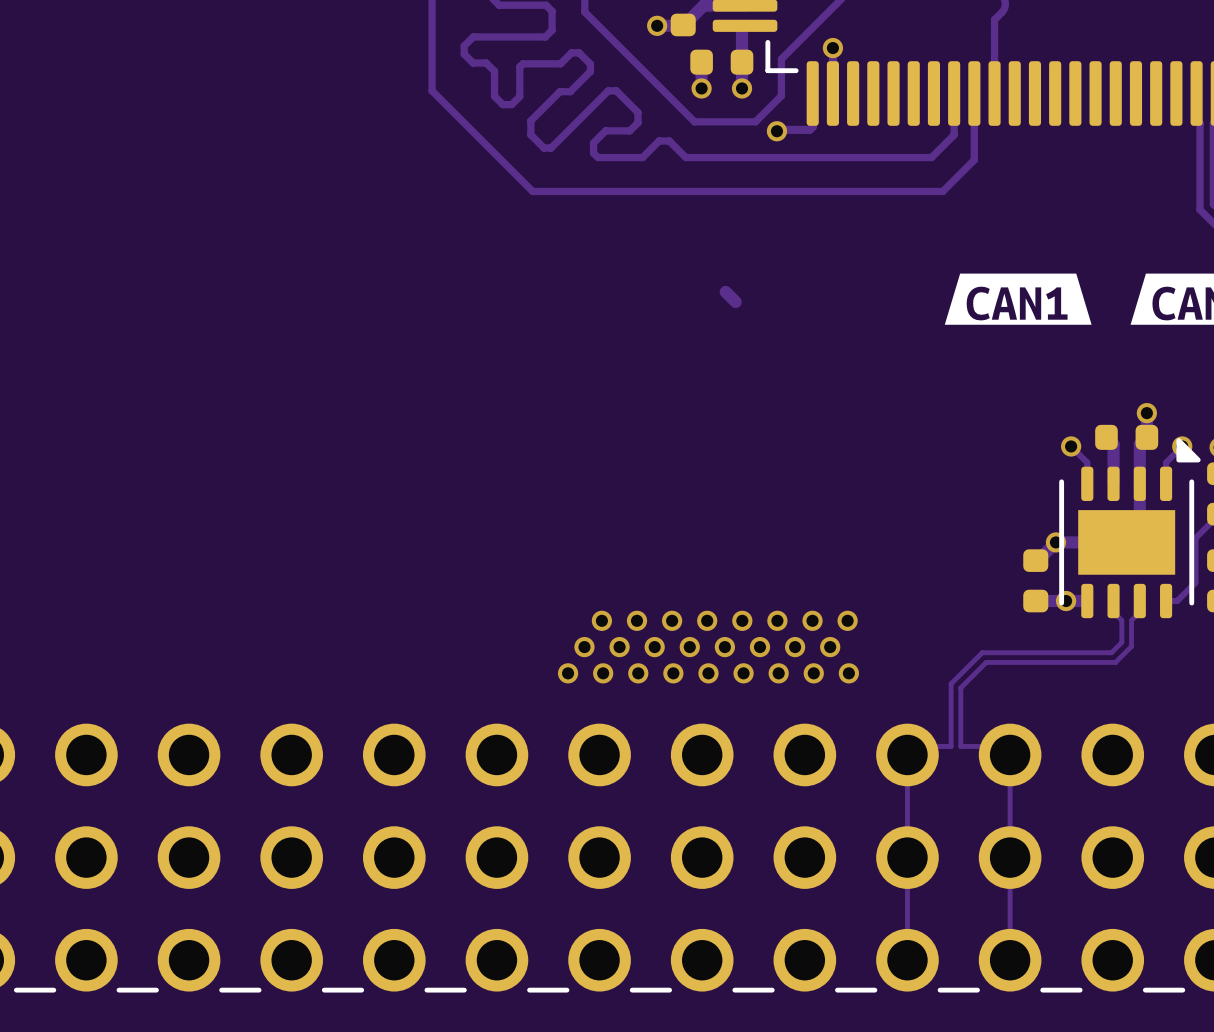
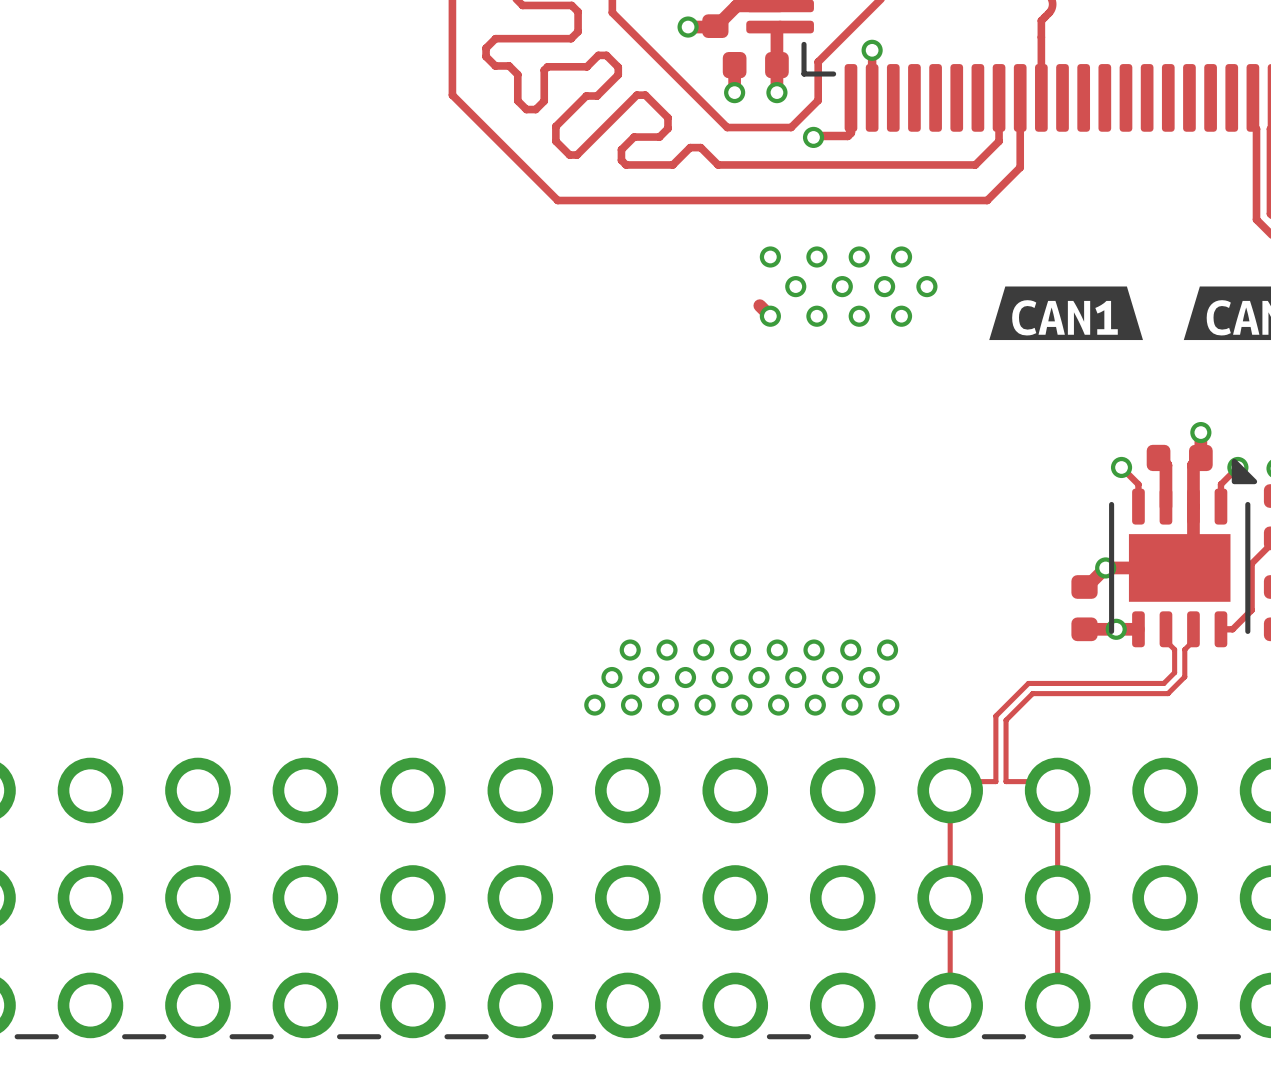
via: none -> (770, 256)
via: none -> (816, 256)
via: none -> (859, 256)
via: none -> (901, 256)
via: none -> (795, 286)
via: none -> (842, 286)
via: none -> (884, 286)
via: none -> (926, 286)
via: none -> (770, 316)
via: none -> (816, 316)
via: none -> (859, 316)
via: none -> (901, 316)

